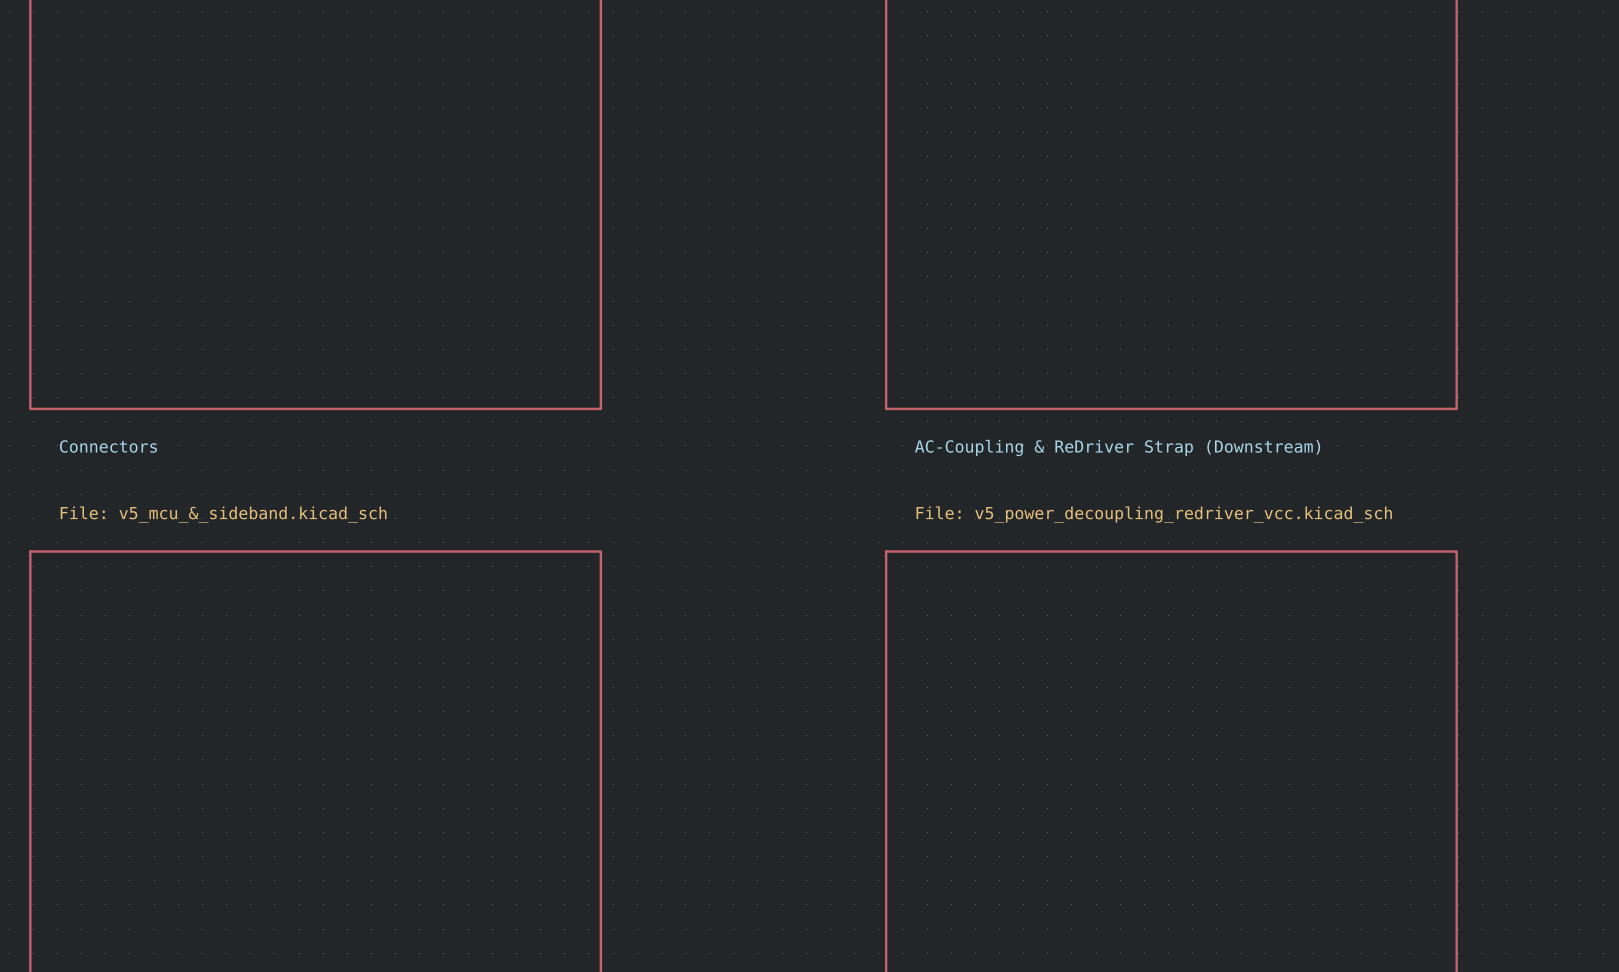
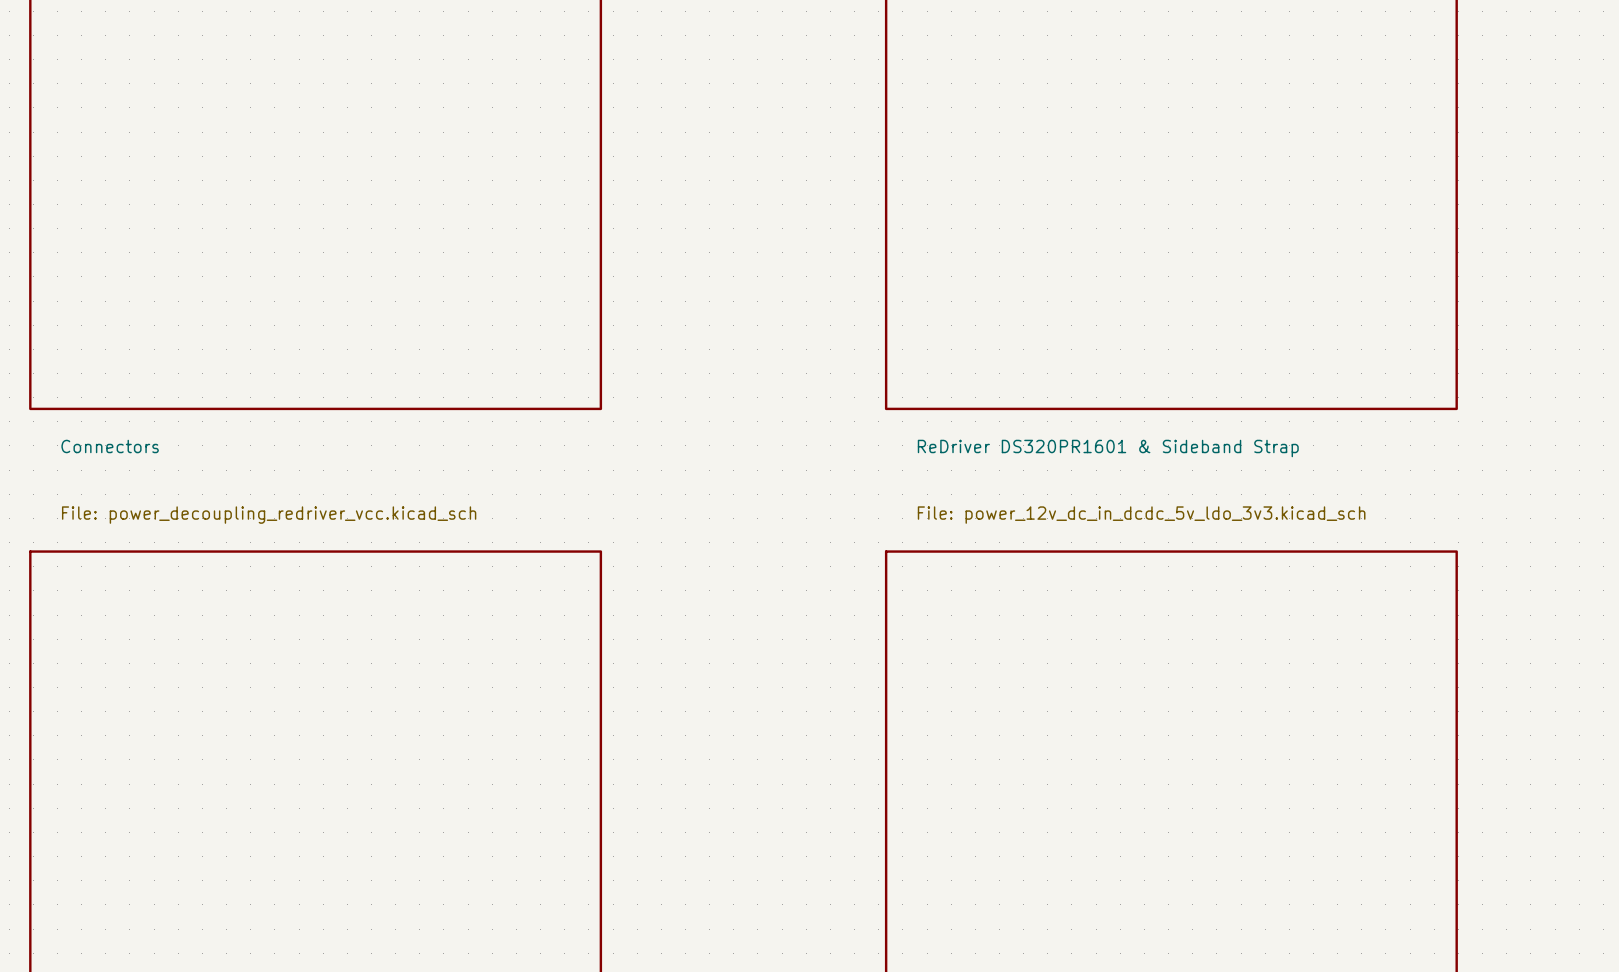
sheet AC-Coupling & ReDriver Strap (Downstream) name: AC-Coupling & ReDriver Strap (Downstream) (1117, 447) -> ReDriver DS320PR1601 & Sideband Strap (1108, 448)
sheet value: File: v5_mcu_&_sideband.kicad_sch (223, 514) -> File: power_decoupling_redriver_vcc.kicad_sch (269, 515)
sheet value: File: v5_power_decoupling_redriver_vcc.kicad_sch (1154, 514) -> File: power_12v_dc_in_dcdc_5v_ldo_3v3.kicad_sch (1141, 515)

